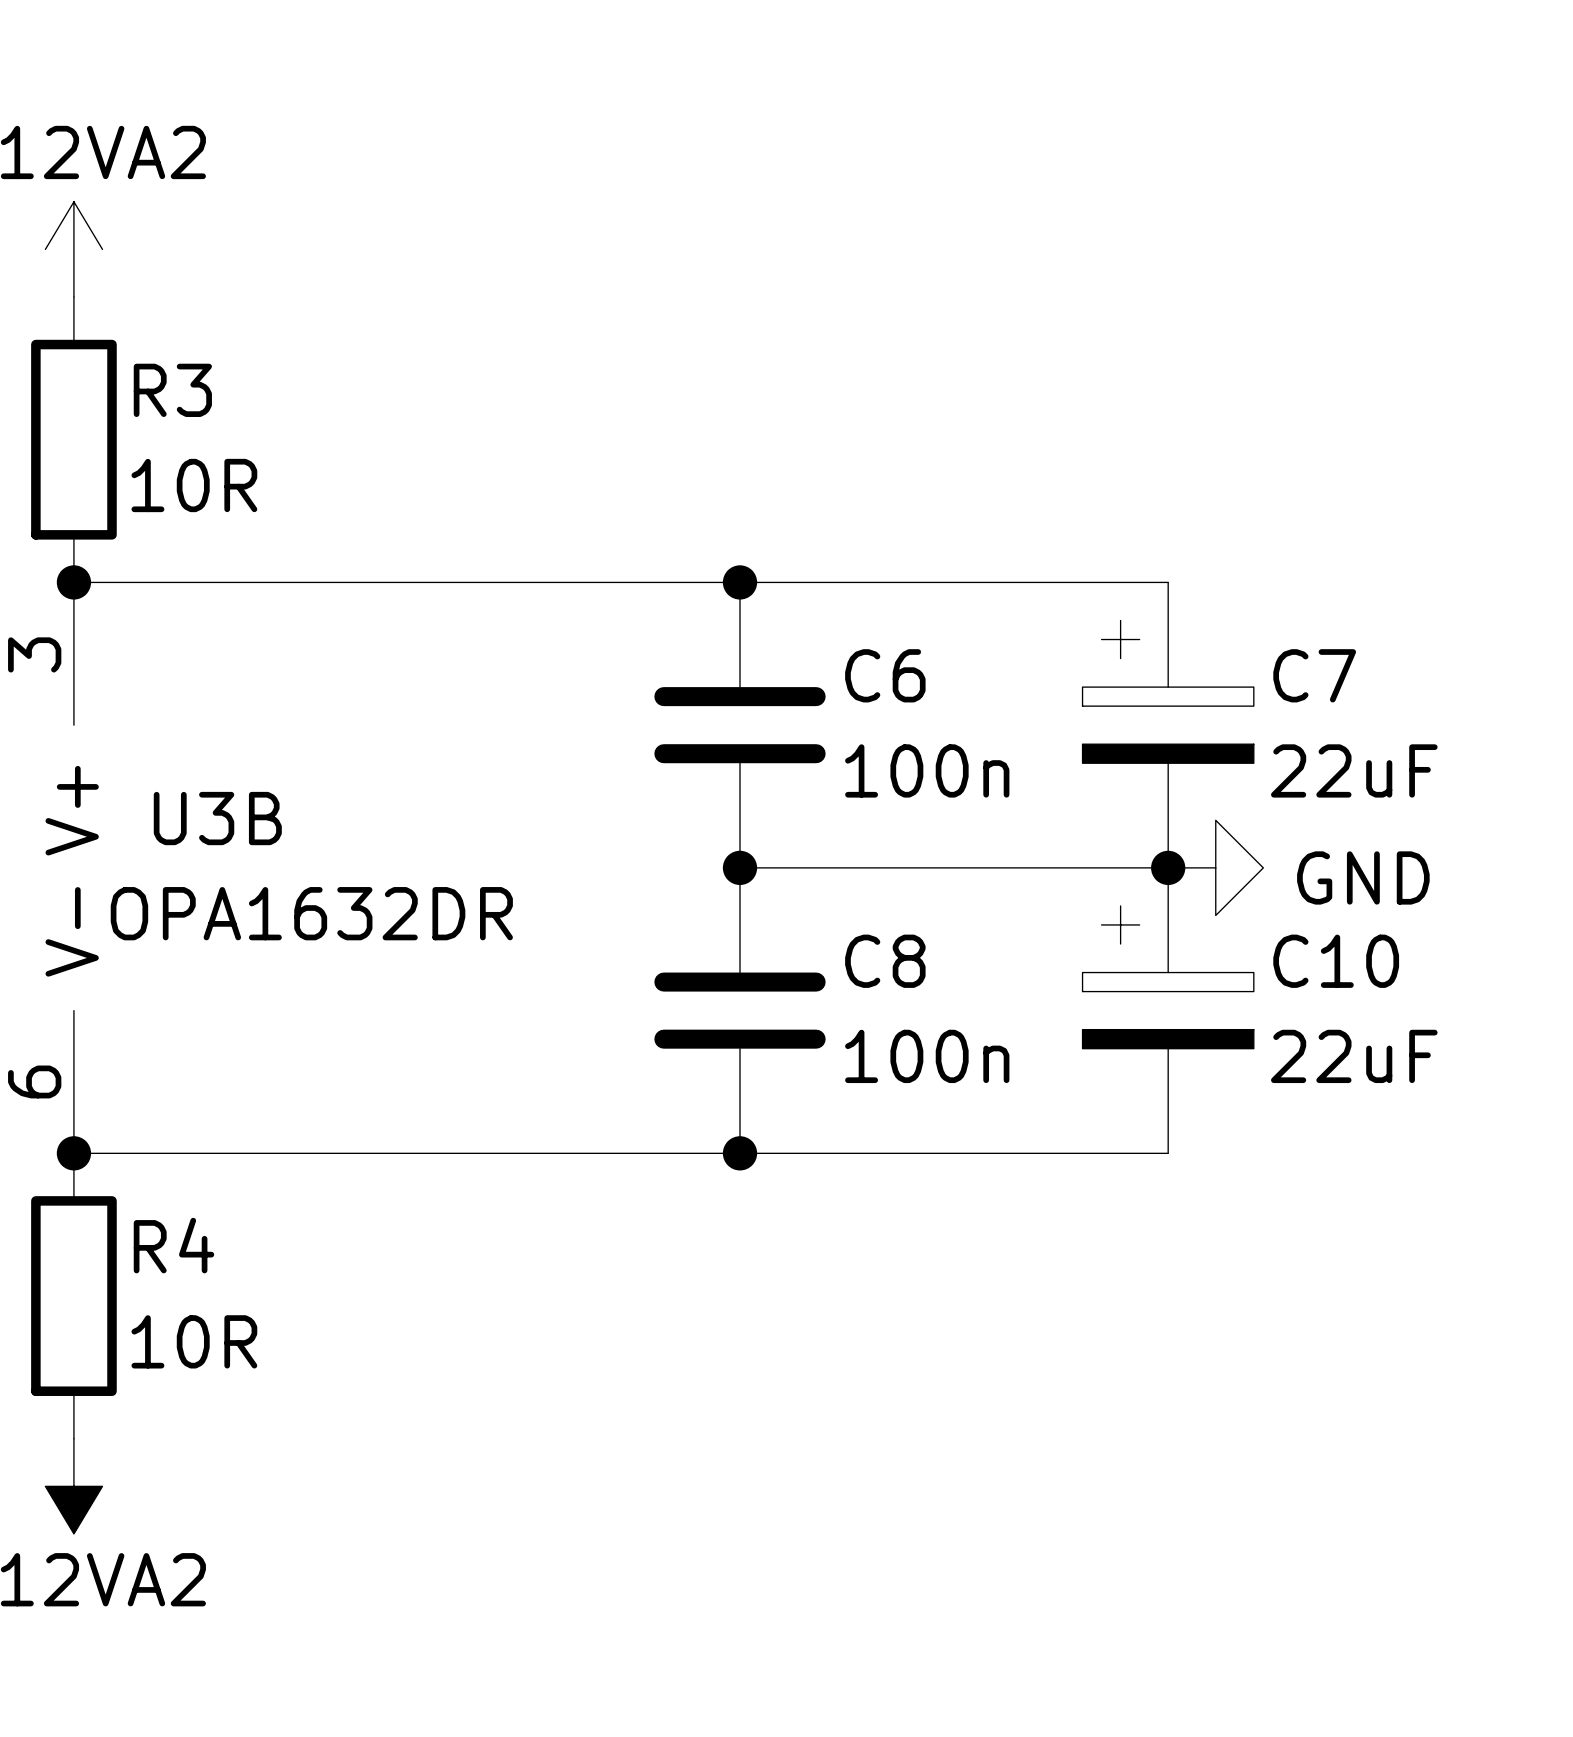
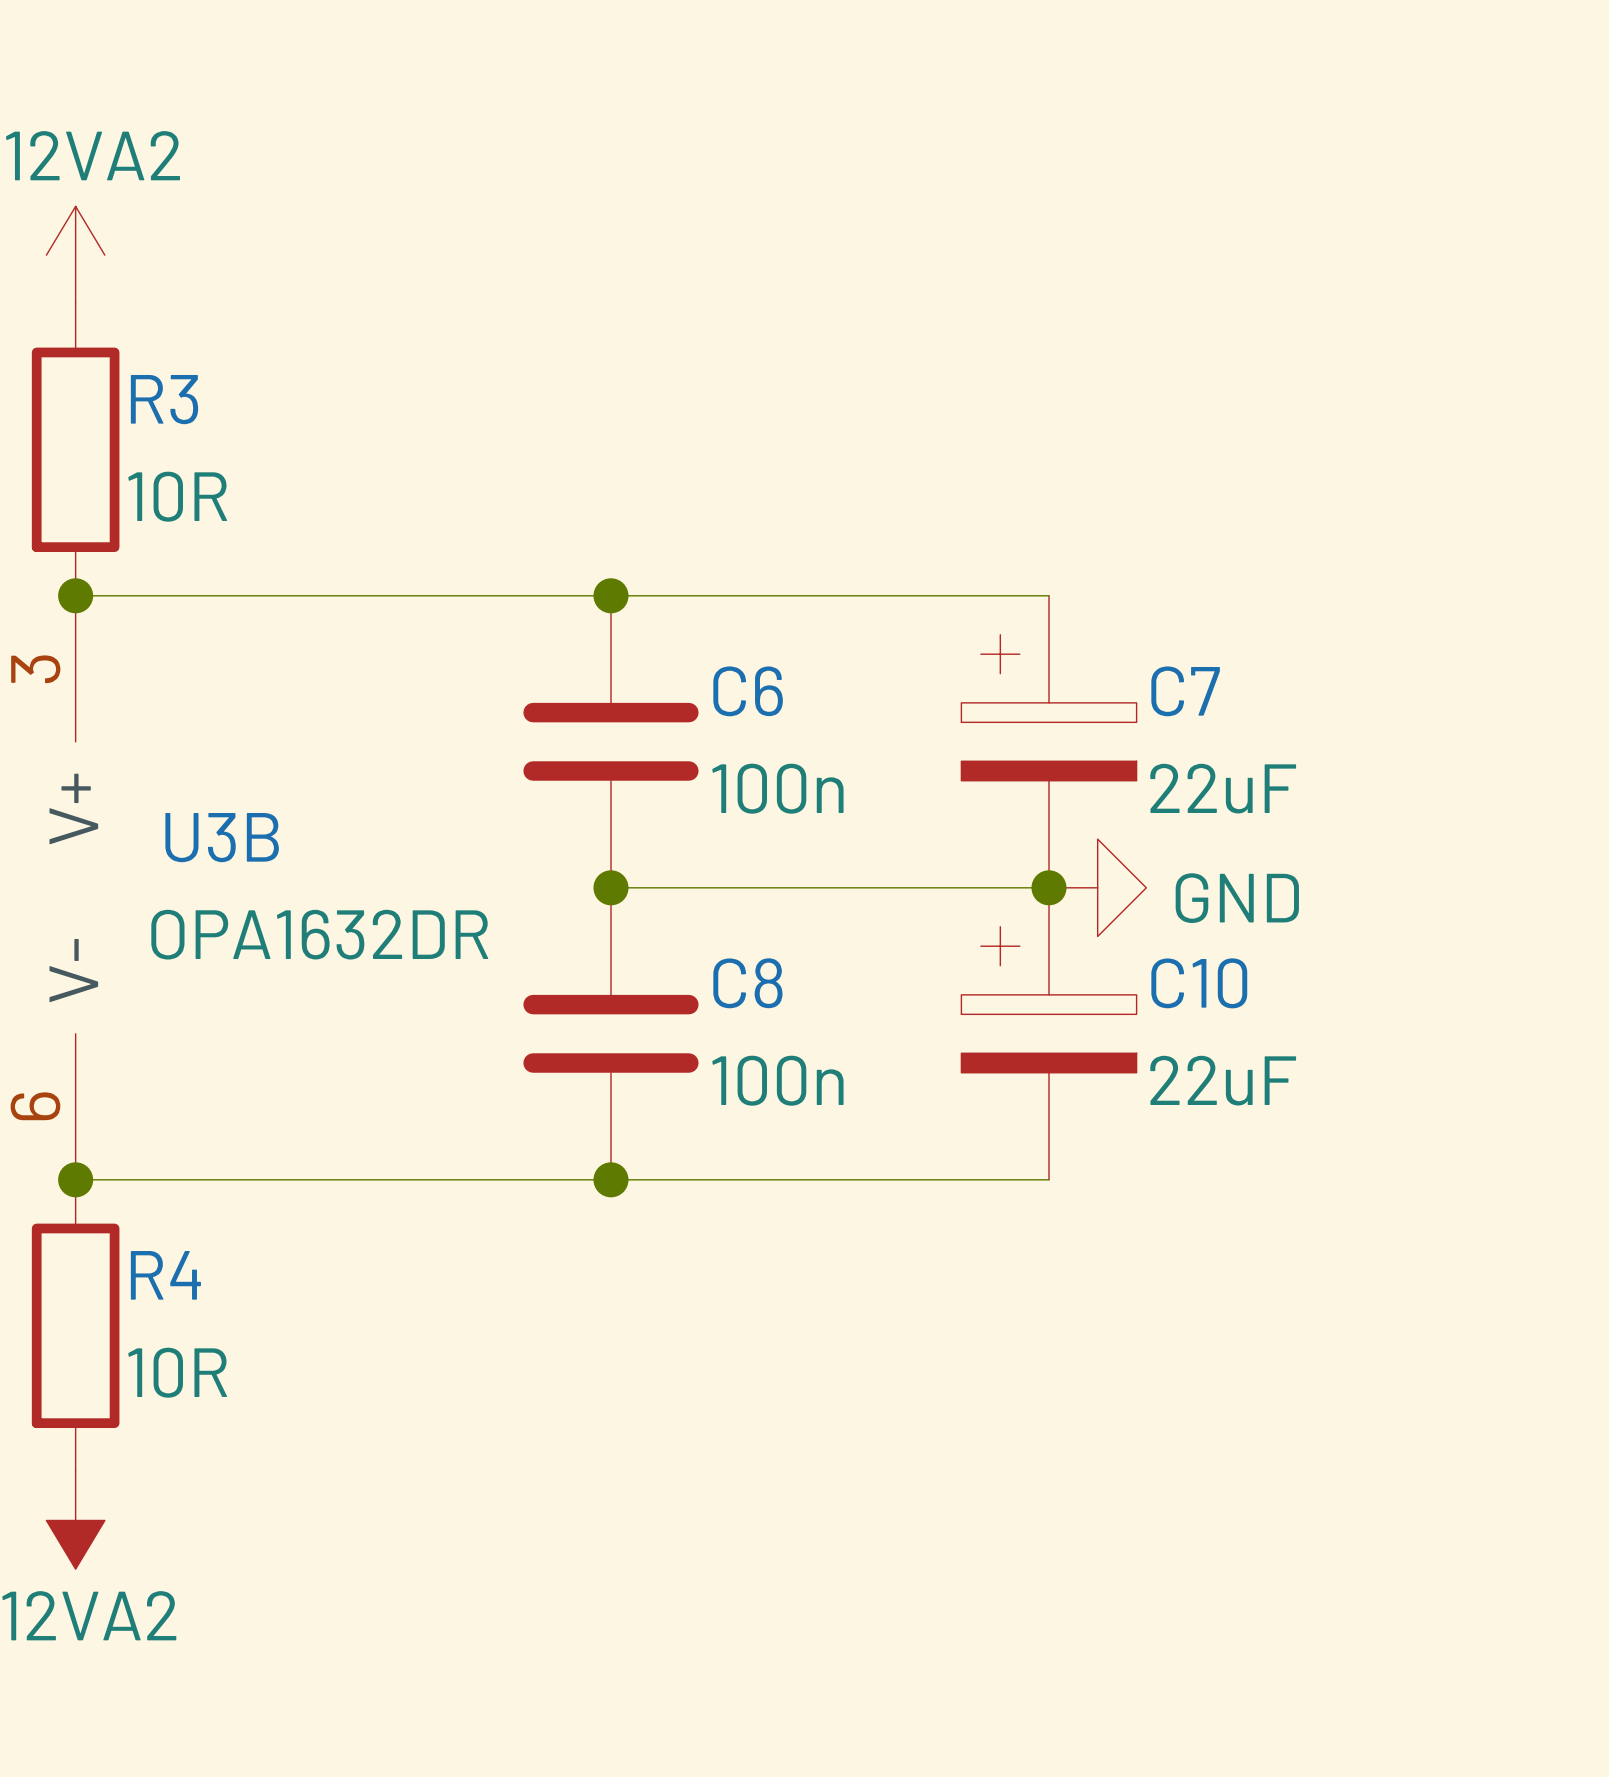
junction position: (740, 582) -> (610, 595)
wire: (1025, 582) (1168, 582) -> none
C6 position: (740, 725) -> (610, 741)
C7 position: (1168, 725) -> (1049, 741)
junction: none -> (610, 887)
junction: (740, 867) -> none
wire: (1025, 867) (1168, 867) -> (610, 887) (756, 887)
junction: none -> (1049, 887)
junction: (1168, 867) -> none
power symbol position: GND (1215, 867) -> GND (1097, 887)
C8 position: (740, 1010) -> (610, 1033)
C10 position: (1168, 1010) -> (1049, 1033)
junction position: (740, 1153) -> (610, 1179)
wire: (1025, 1153) (1168, 1153) -> none

